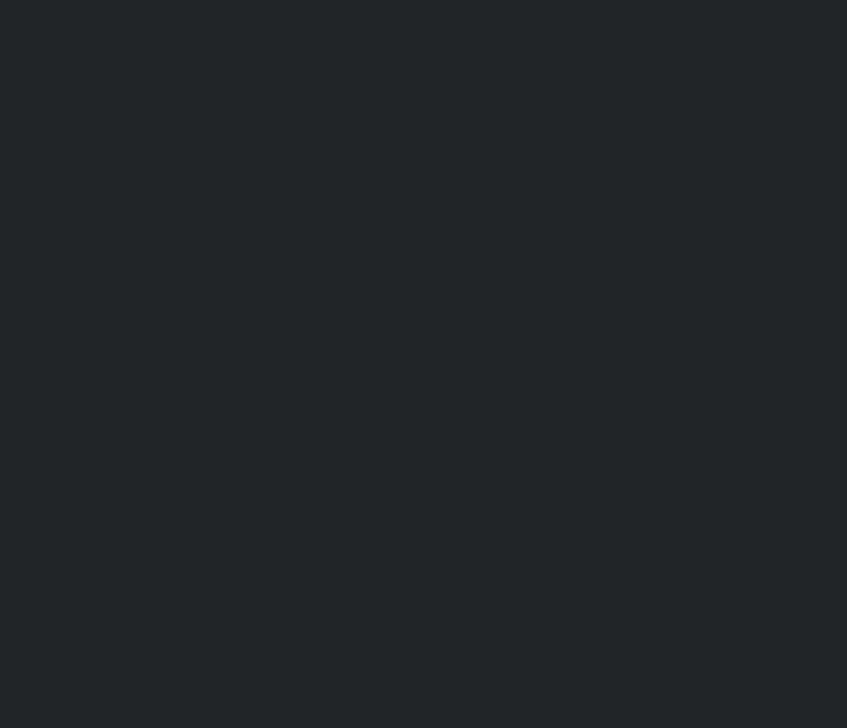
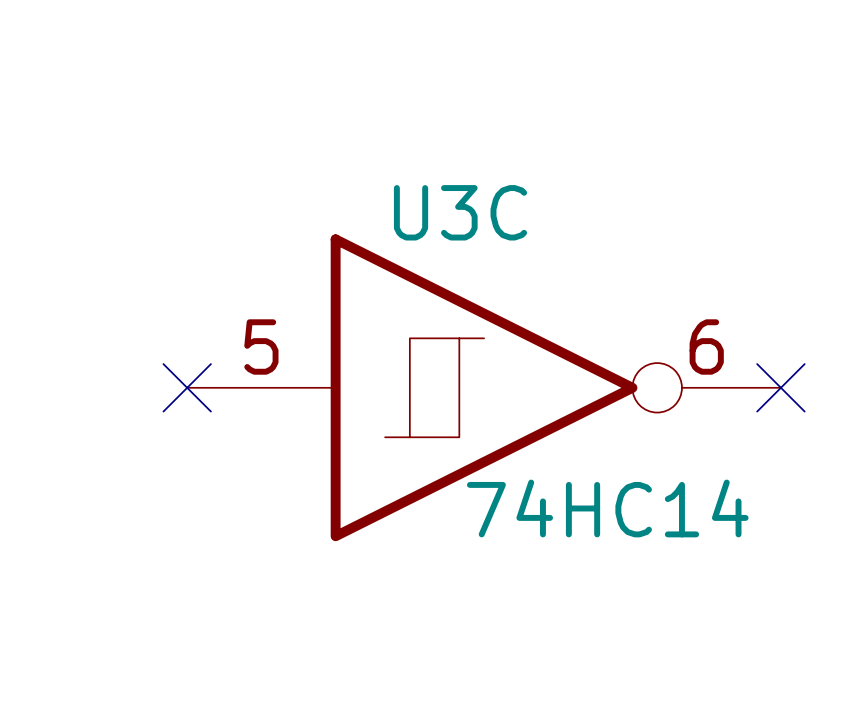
no-connect mark: none -> (187, 387)
U3C: none -> 74HC14 (484, 387)
no-connect mark: none -> (780, 387)

